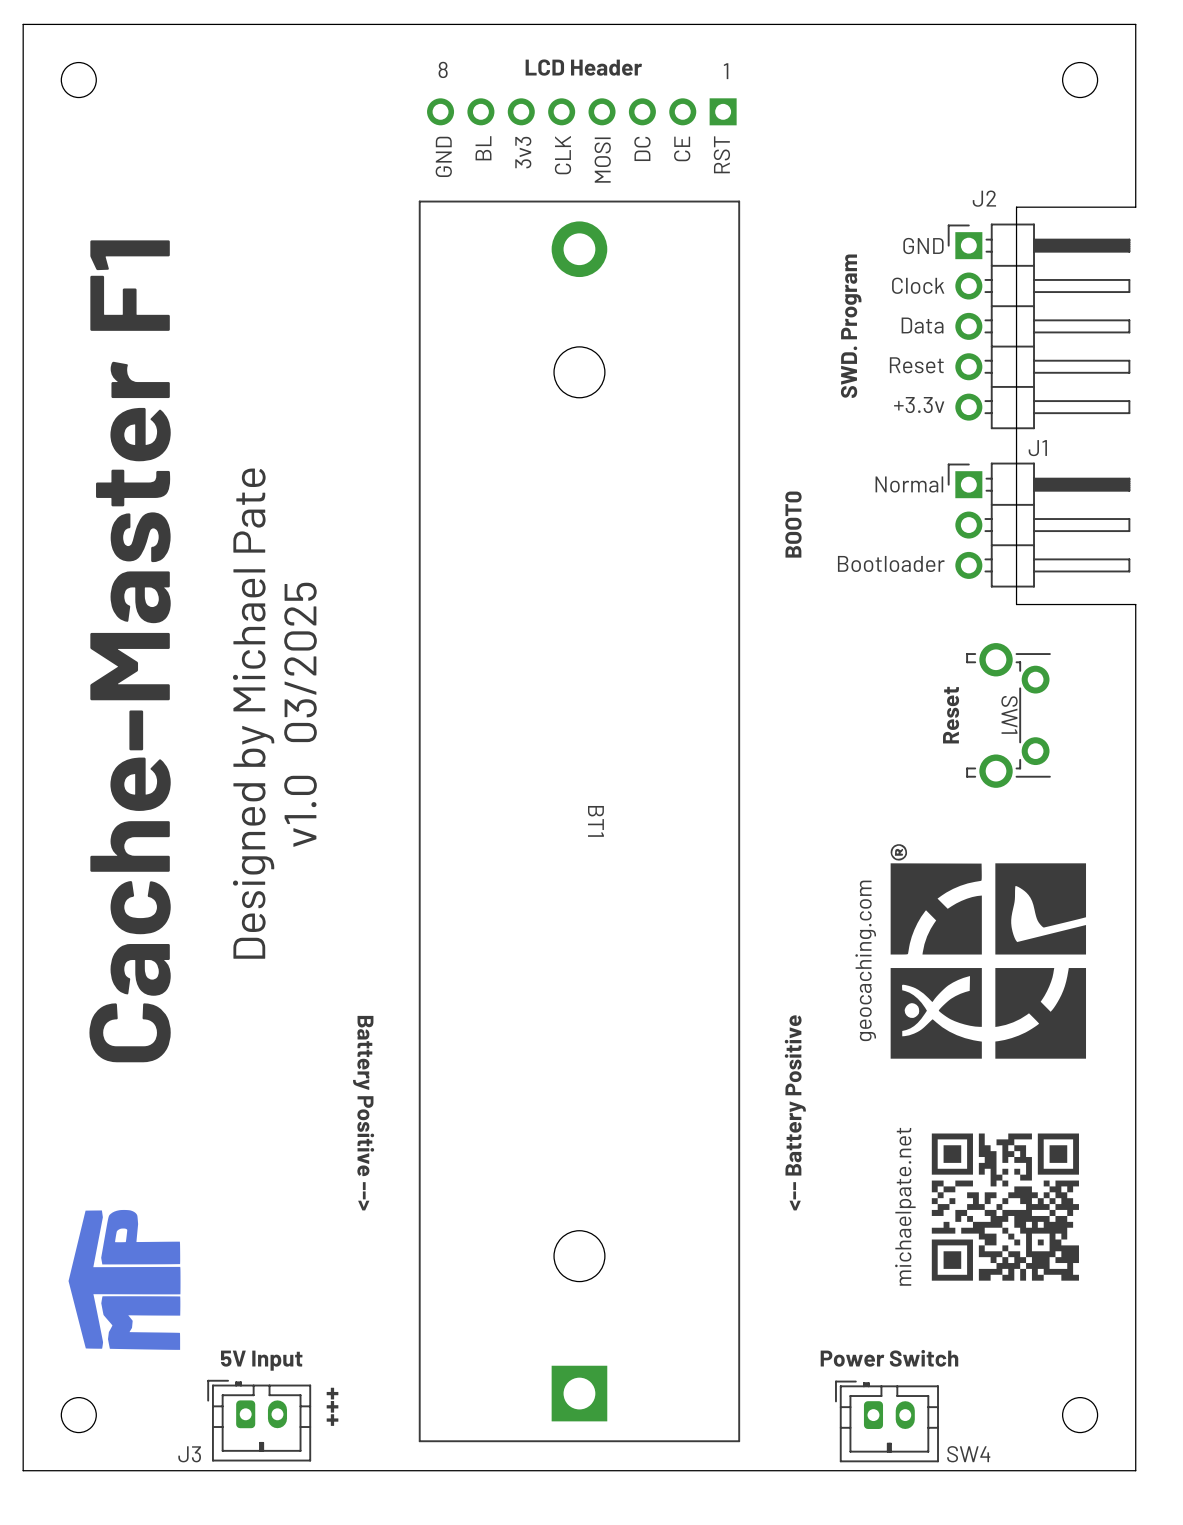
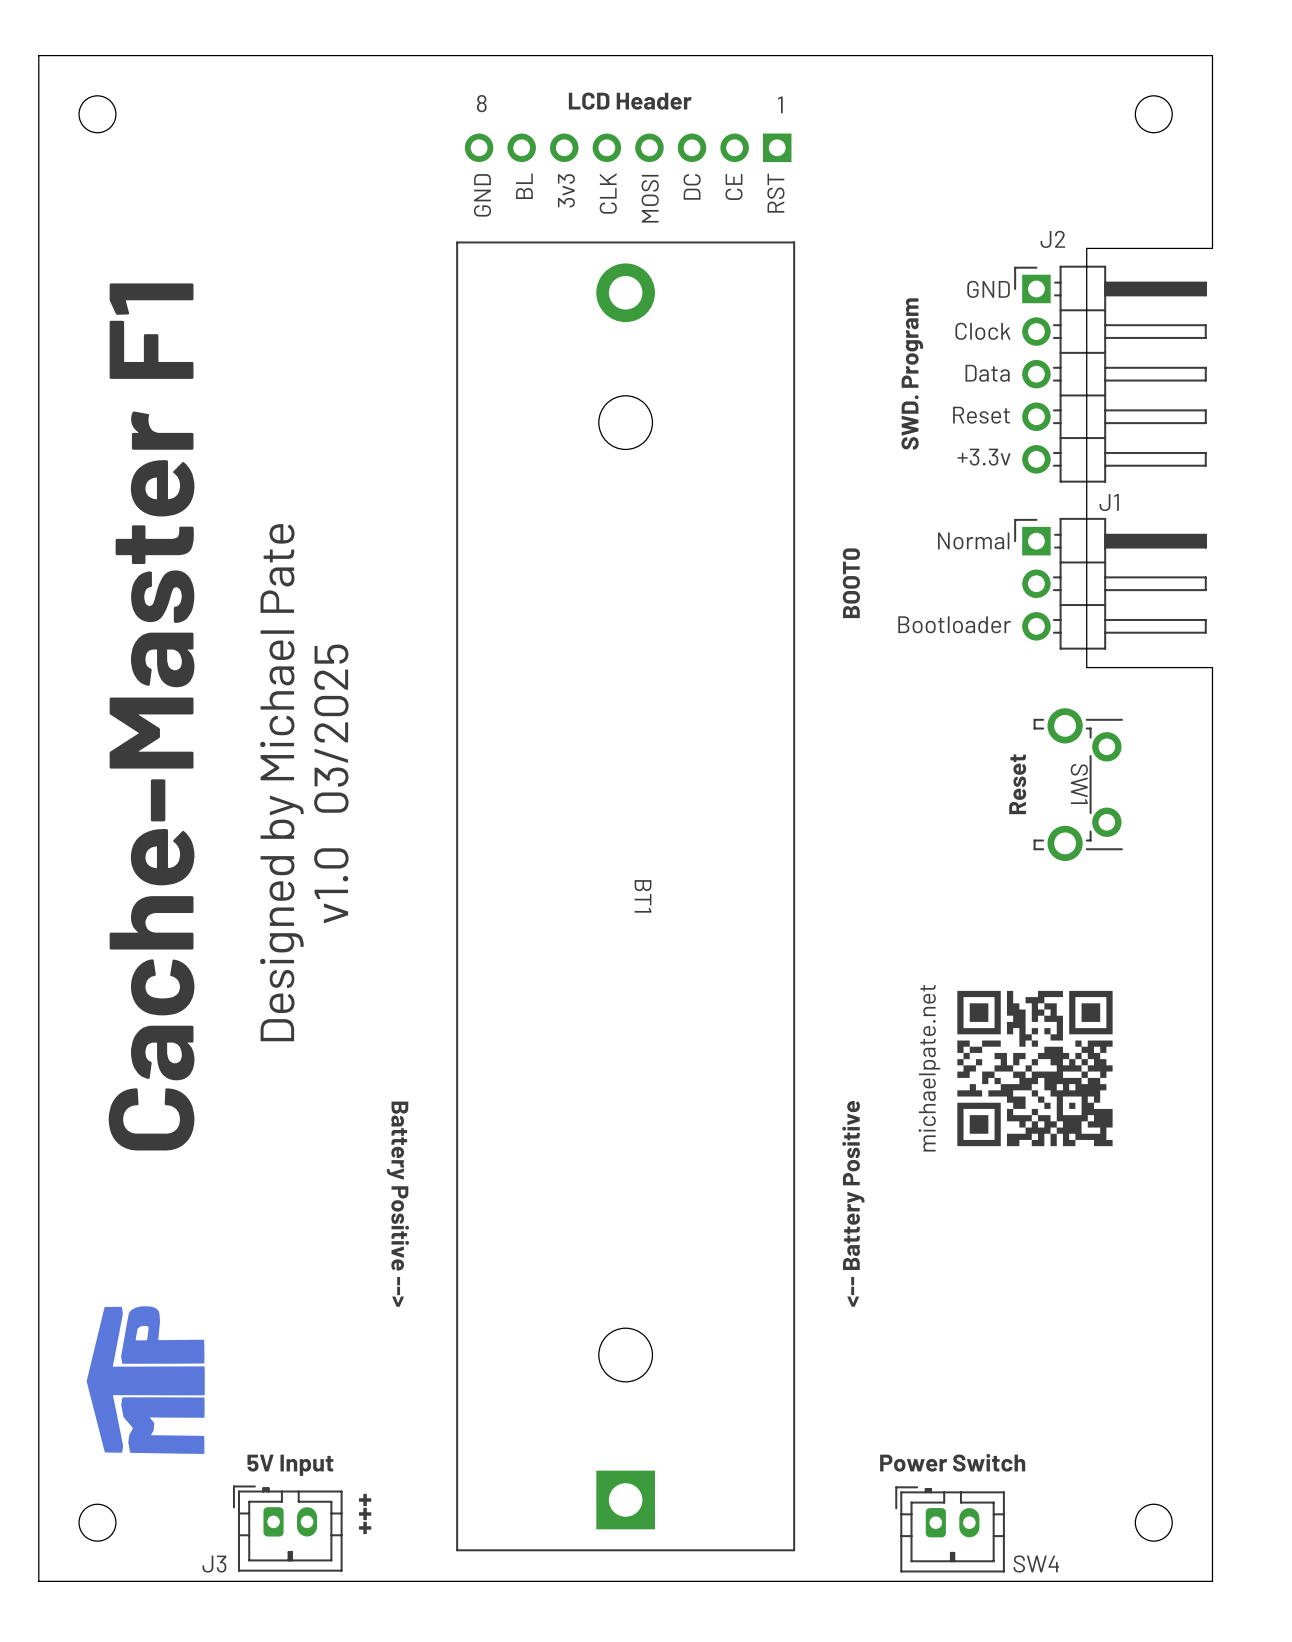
drawing: [890, 844, 1087, 1059] -> none
text: geocaching.com (865, 960) -> none
text position: michaelpate.net (905, 1206) -> michaelpate.net (929, 1068)
drawing position: (1005, 1207) -> (1034, 1068)

